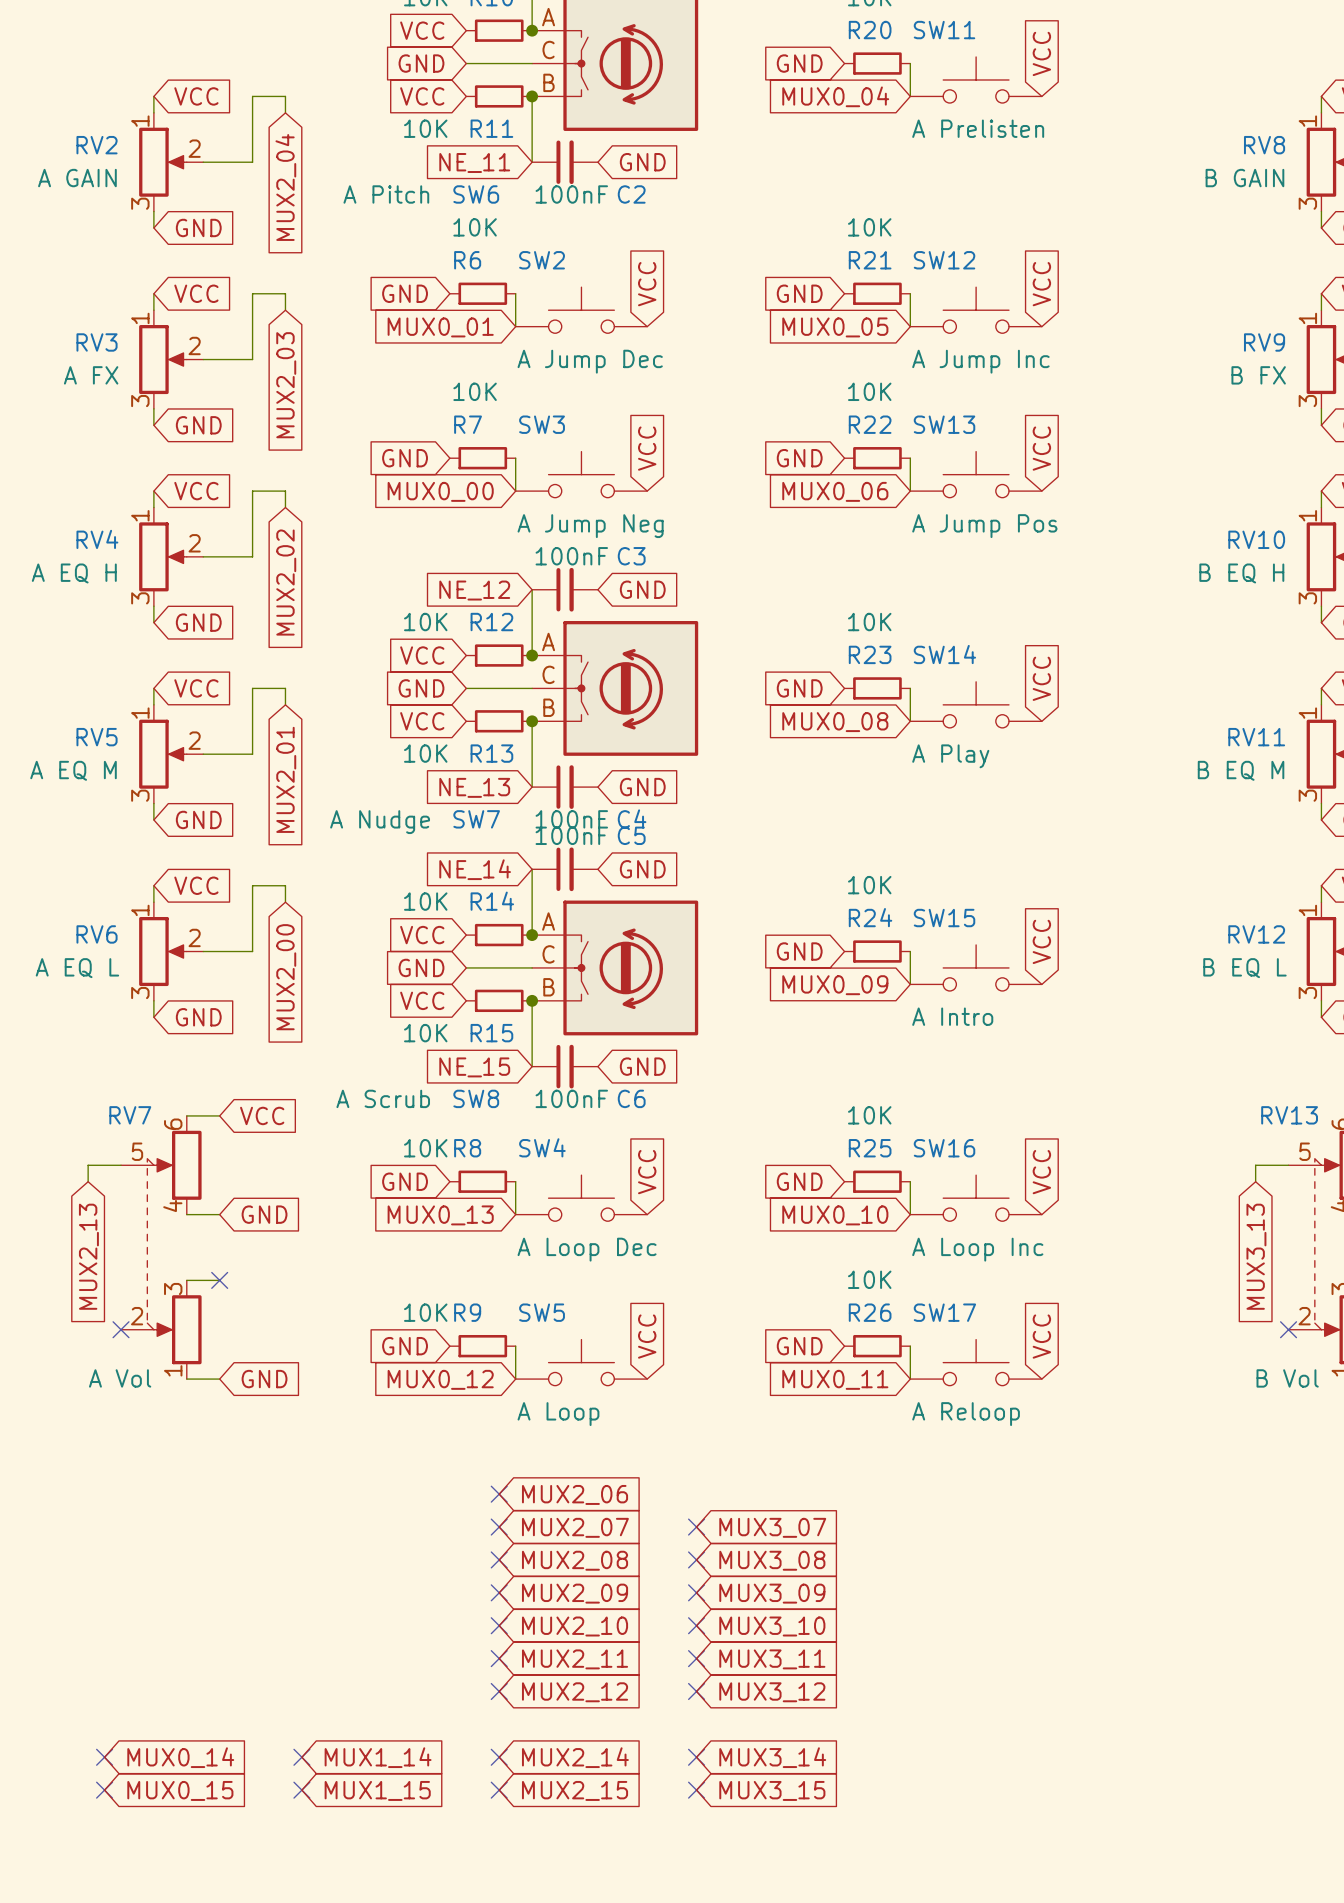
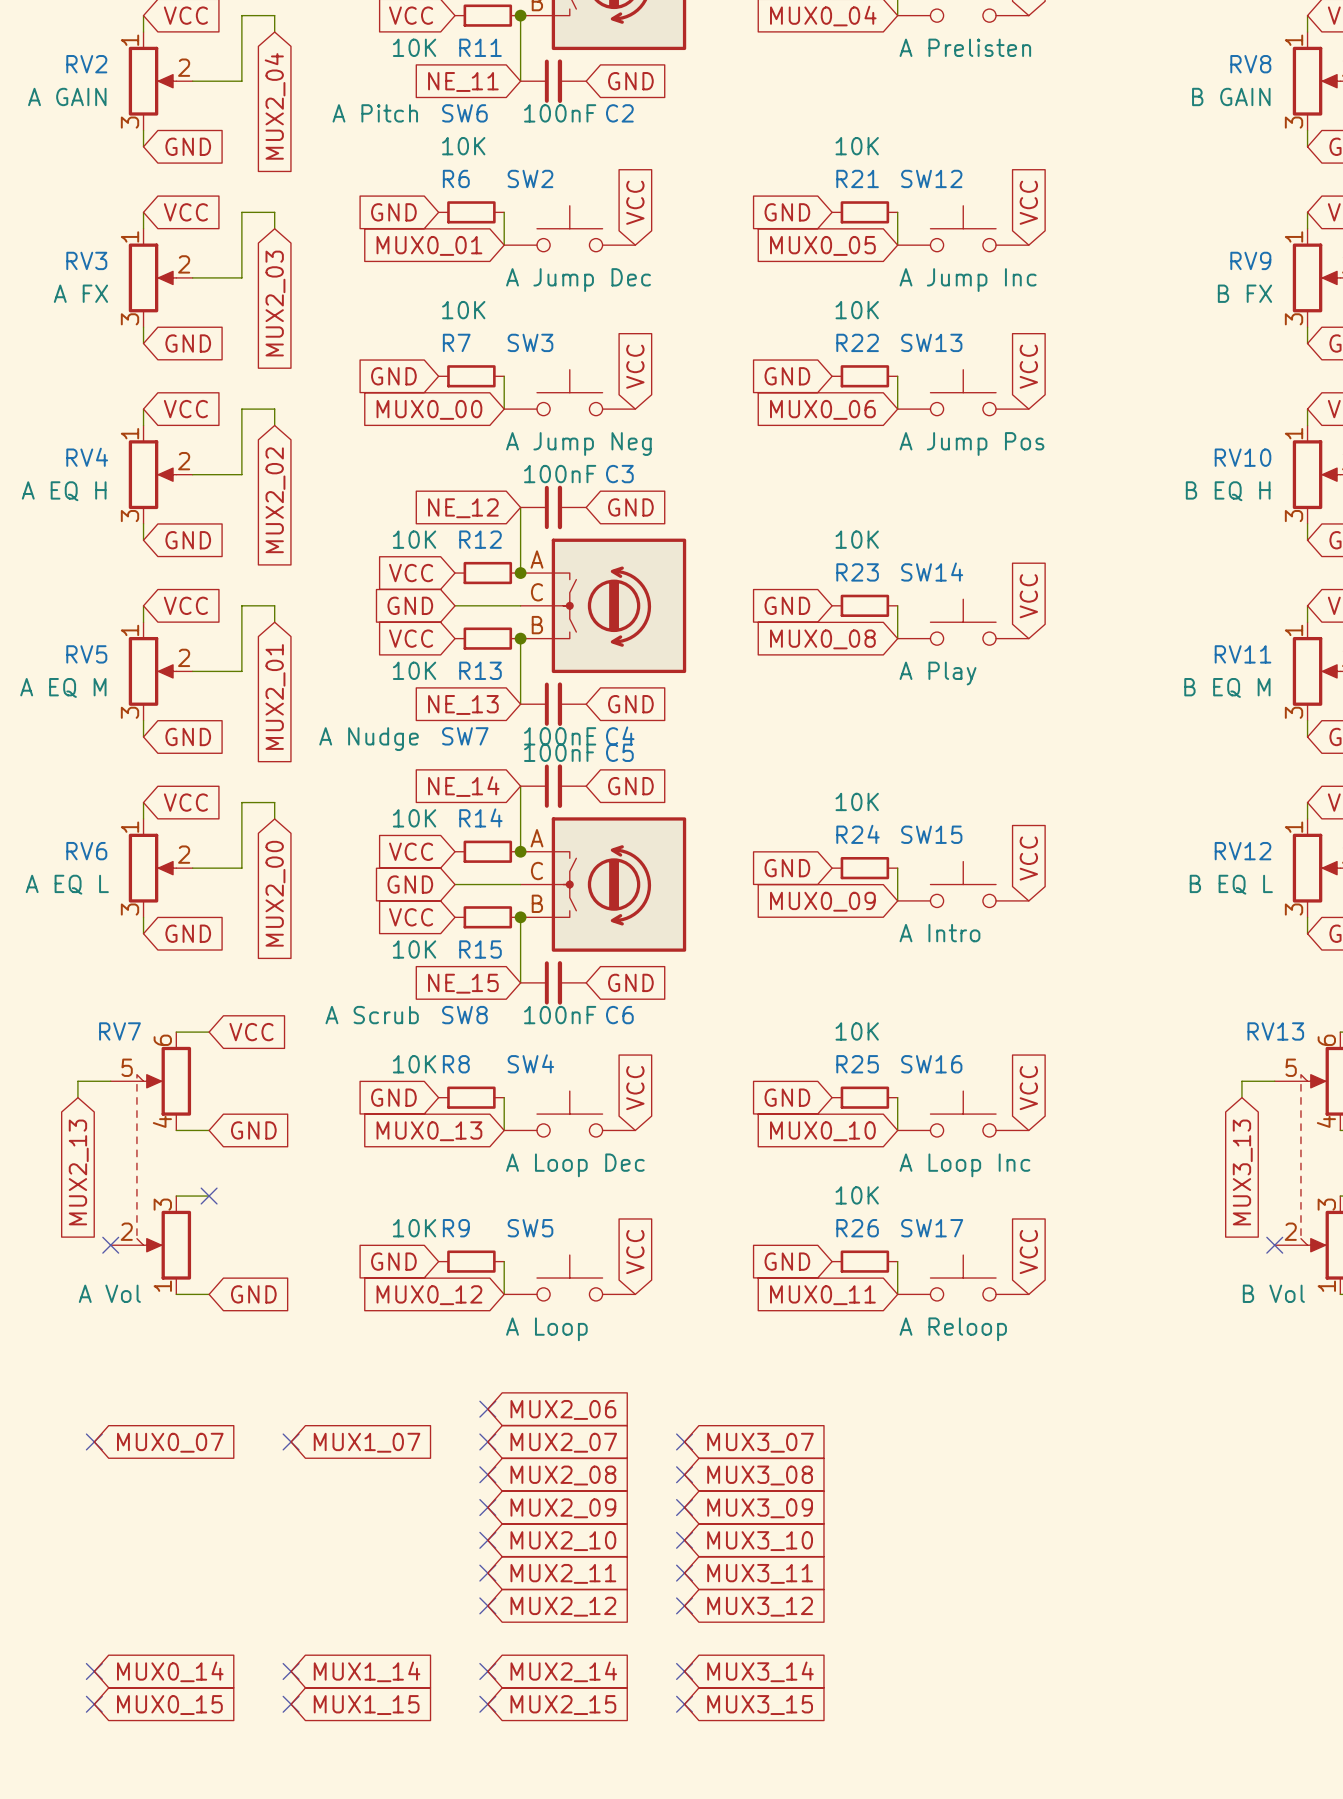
no-connect mark: none -> (94, 1441)
global label: none -> MUX0_07 (170, 1442)
no-connect mark: none -> (291, 1441)
global label: none -> MUX1_07 (367, 1442)

